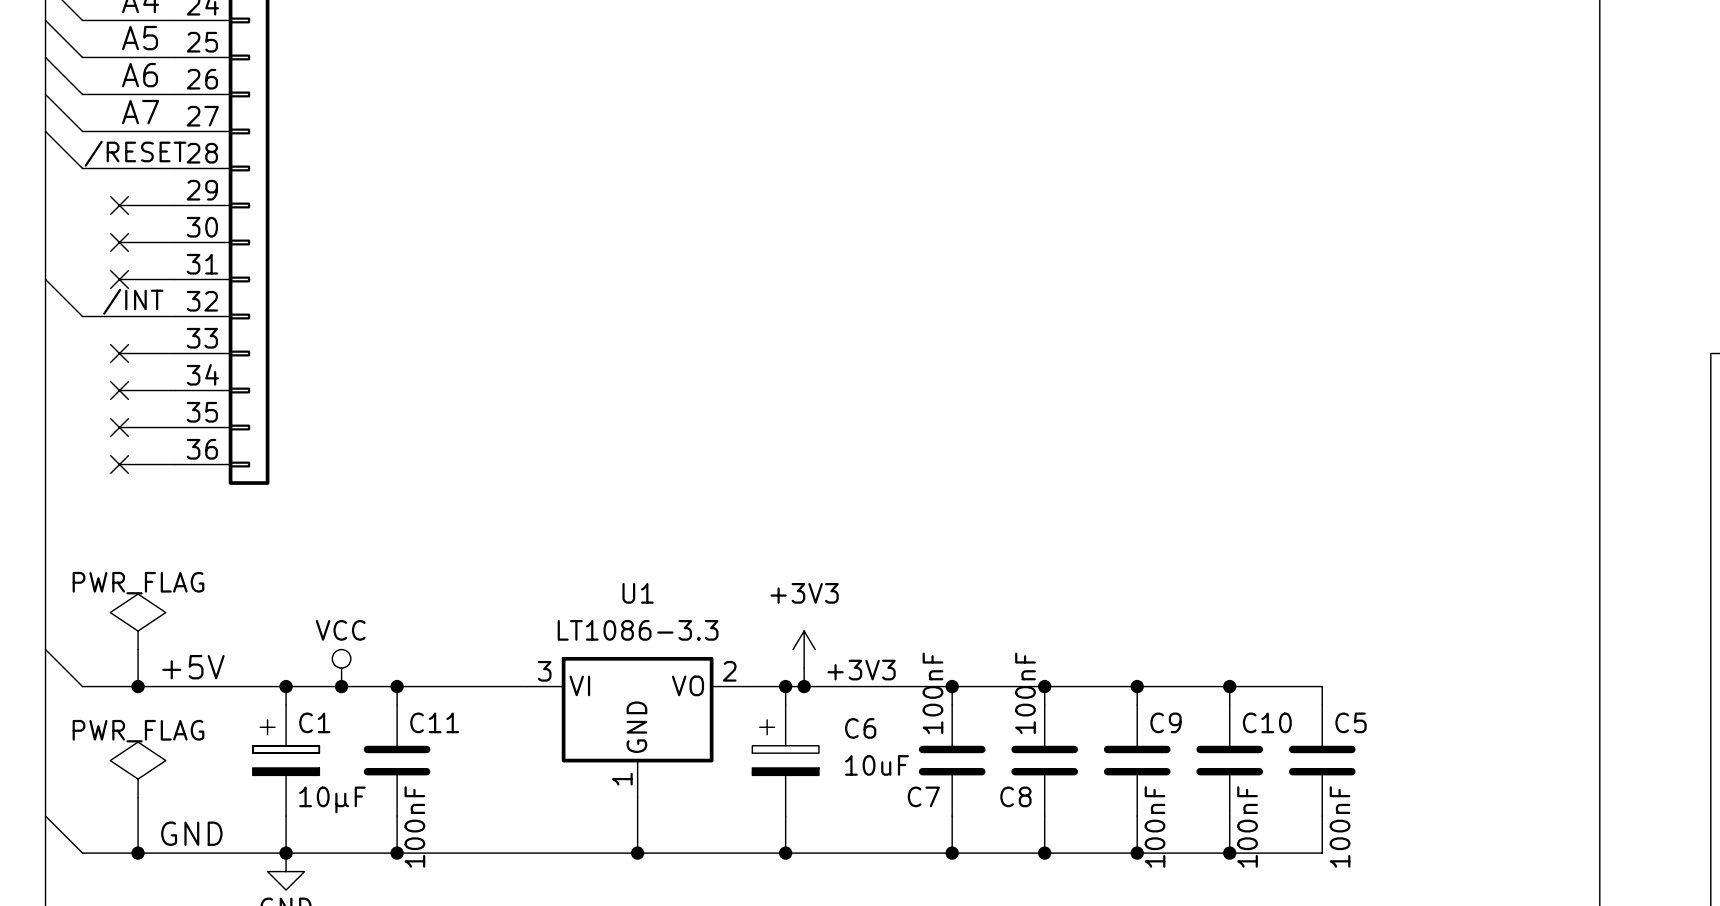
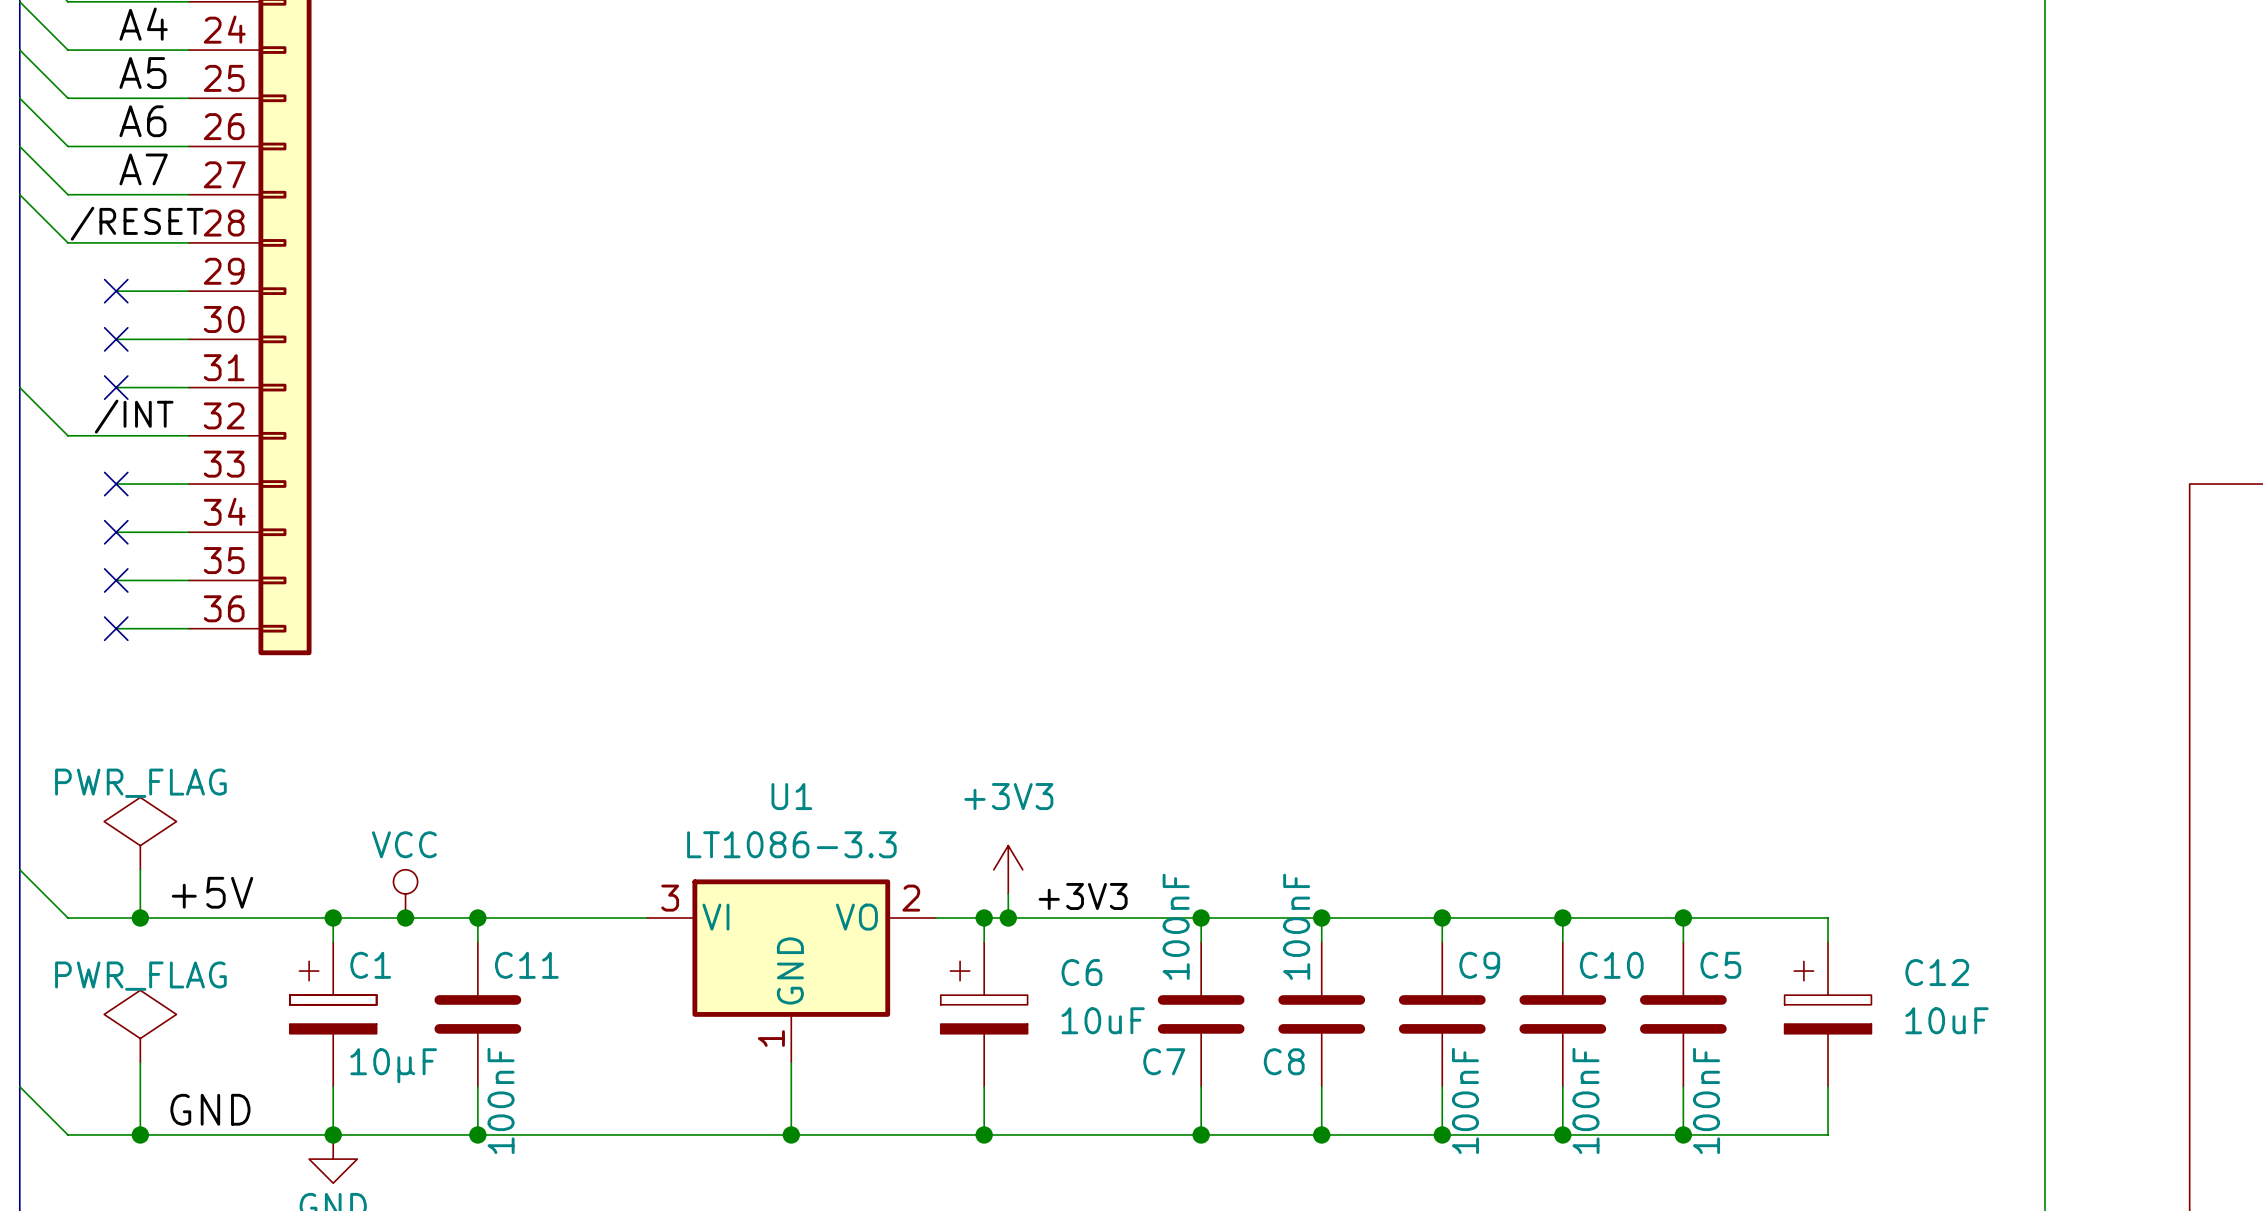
wire: none -> (1683, 917) (1828, 917) (1828, 942)
junction: none -> (1683, 917)
C12: none -> 10uF (1828, 1014)
wire: none -> (1828, 1086) (1828, 1134) (1683, 1134)
junction: none -> (1683, 1134)

